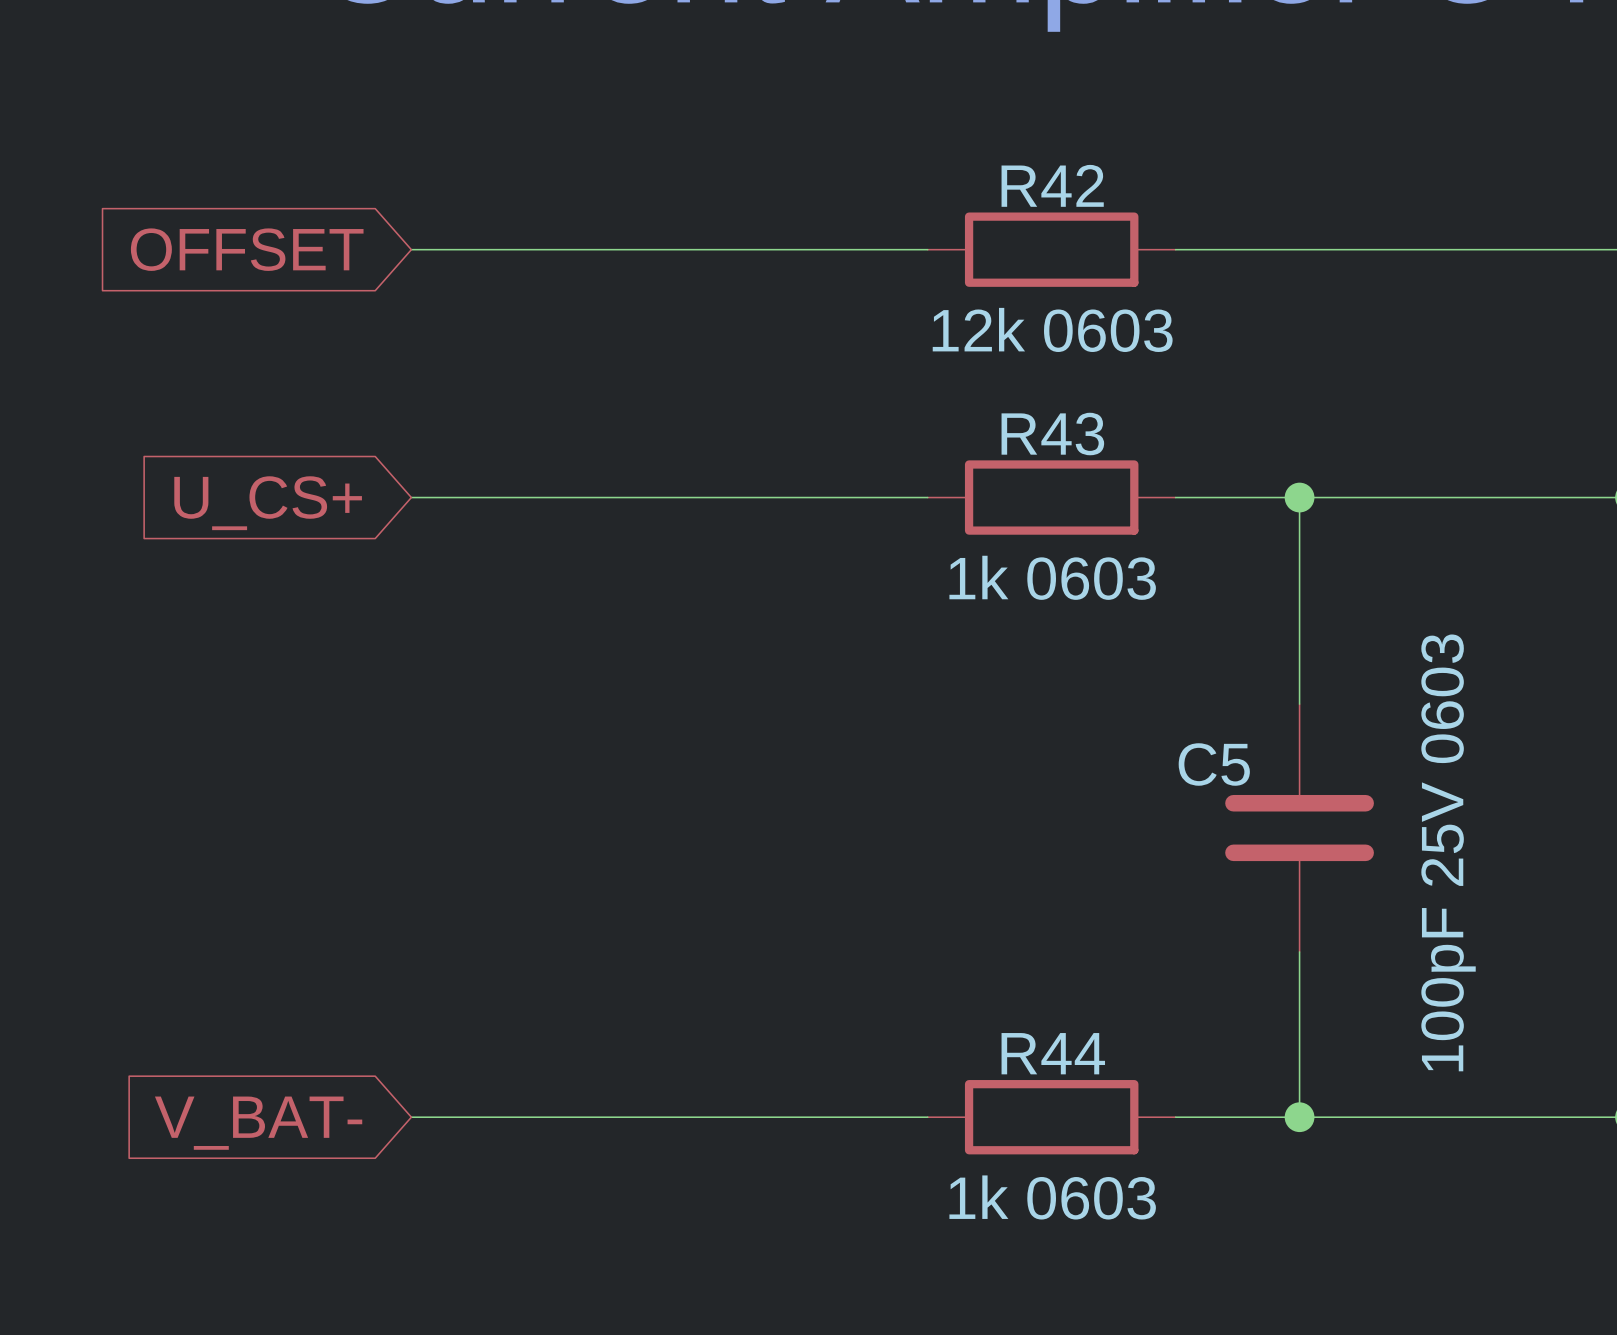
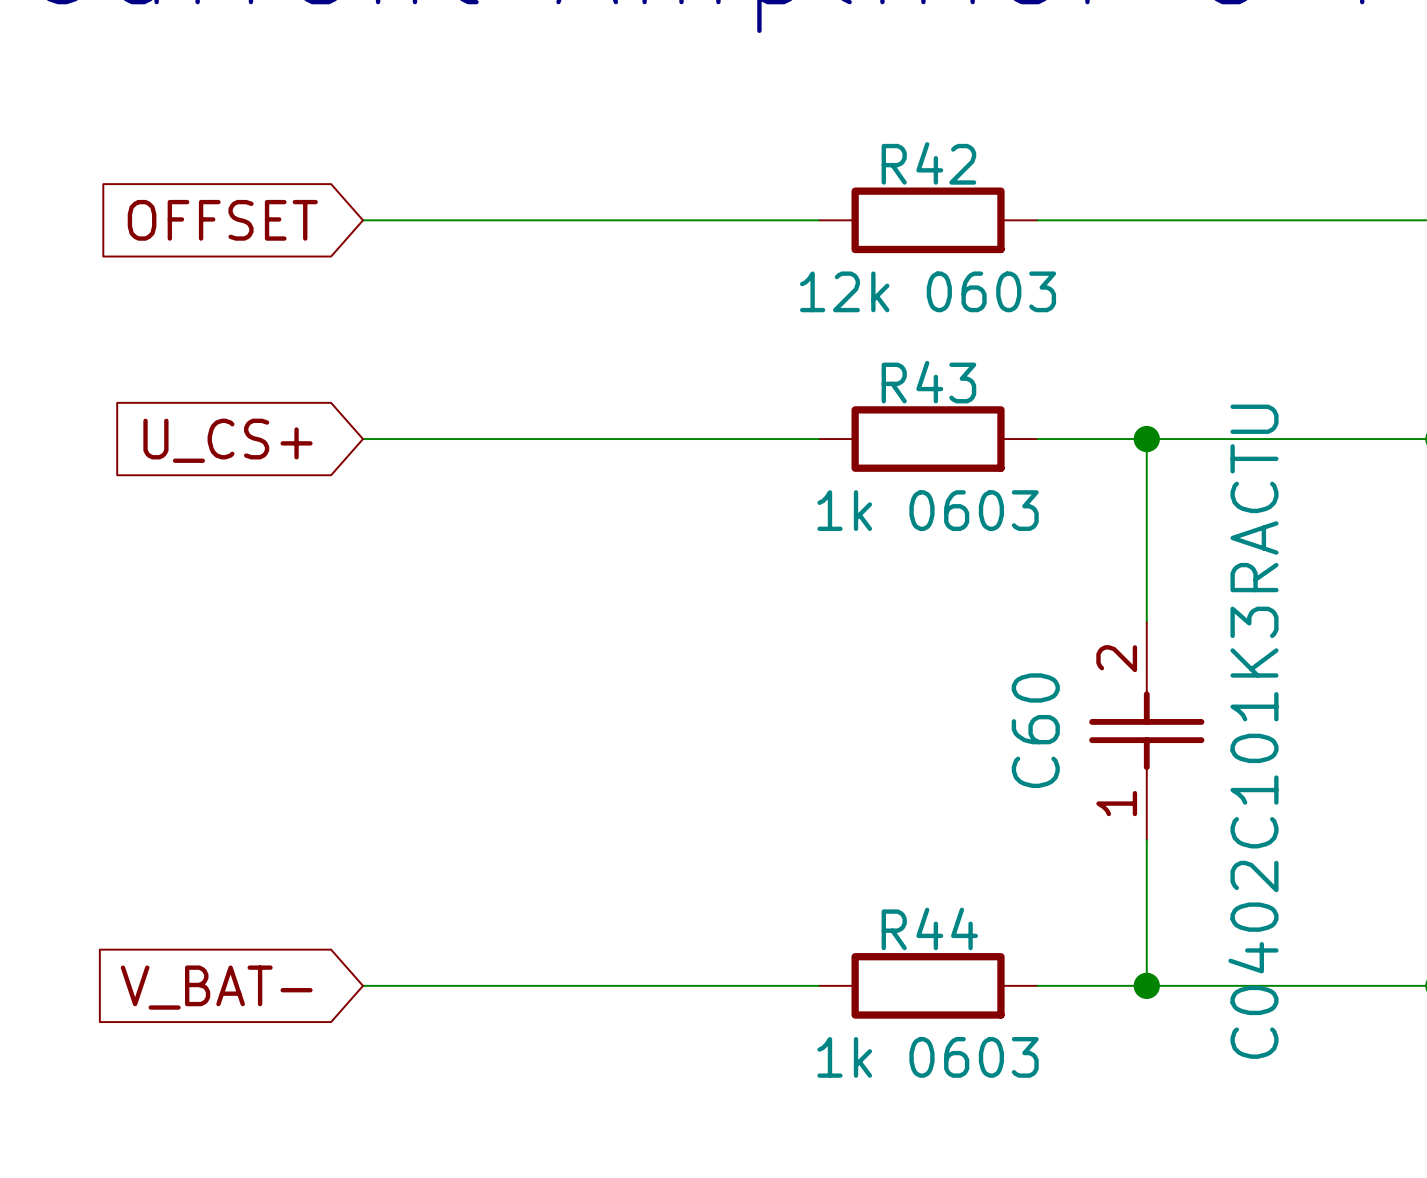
C5: 100pF 25V 0603 (1299, 828) -> none
C60: none -> C0402C101K3RACTU (1146, 730)

